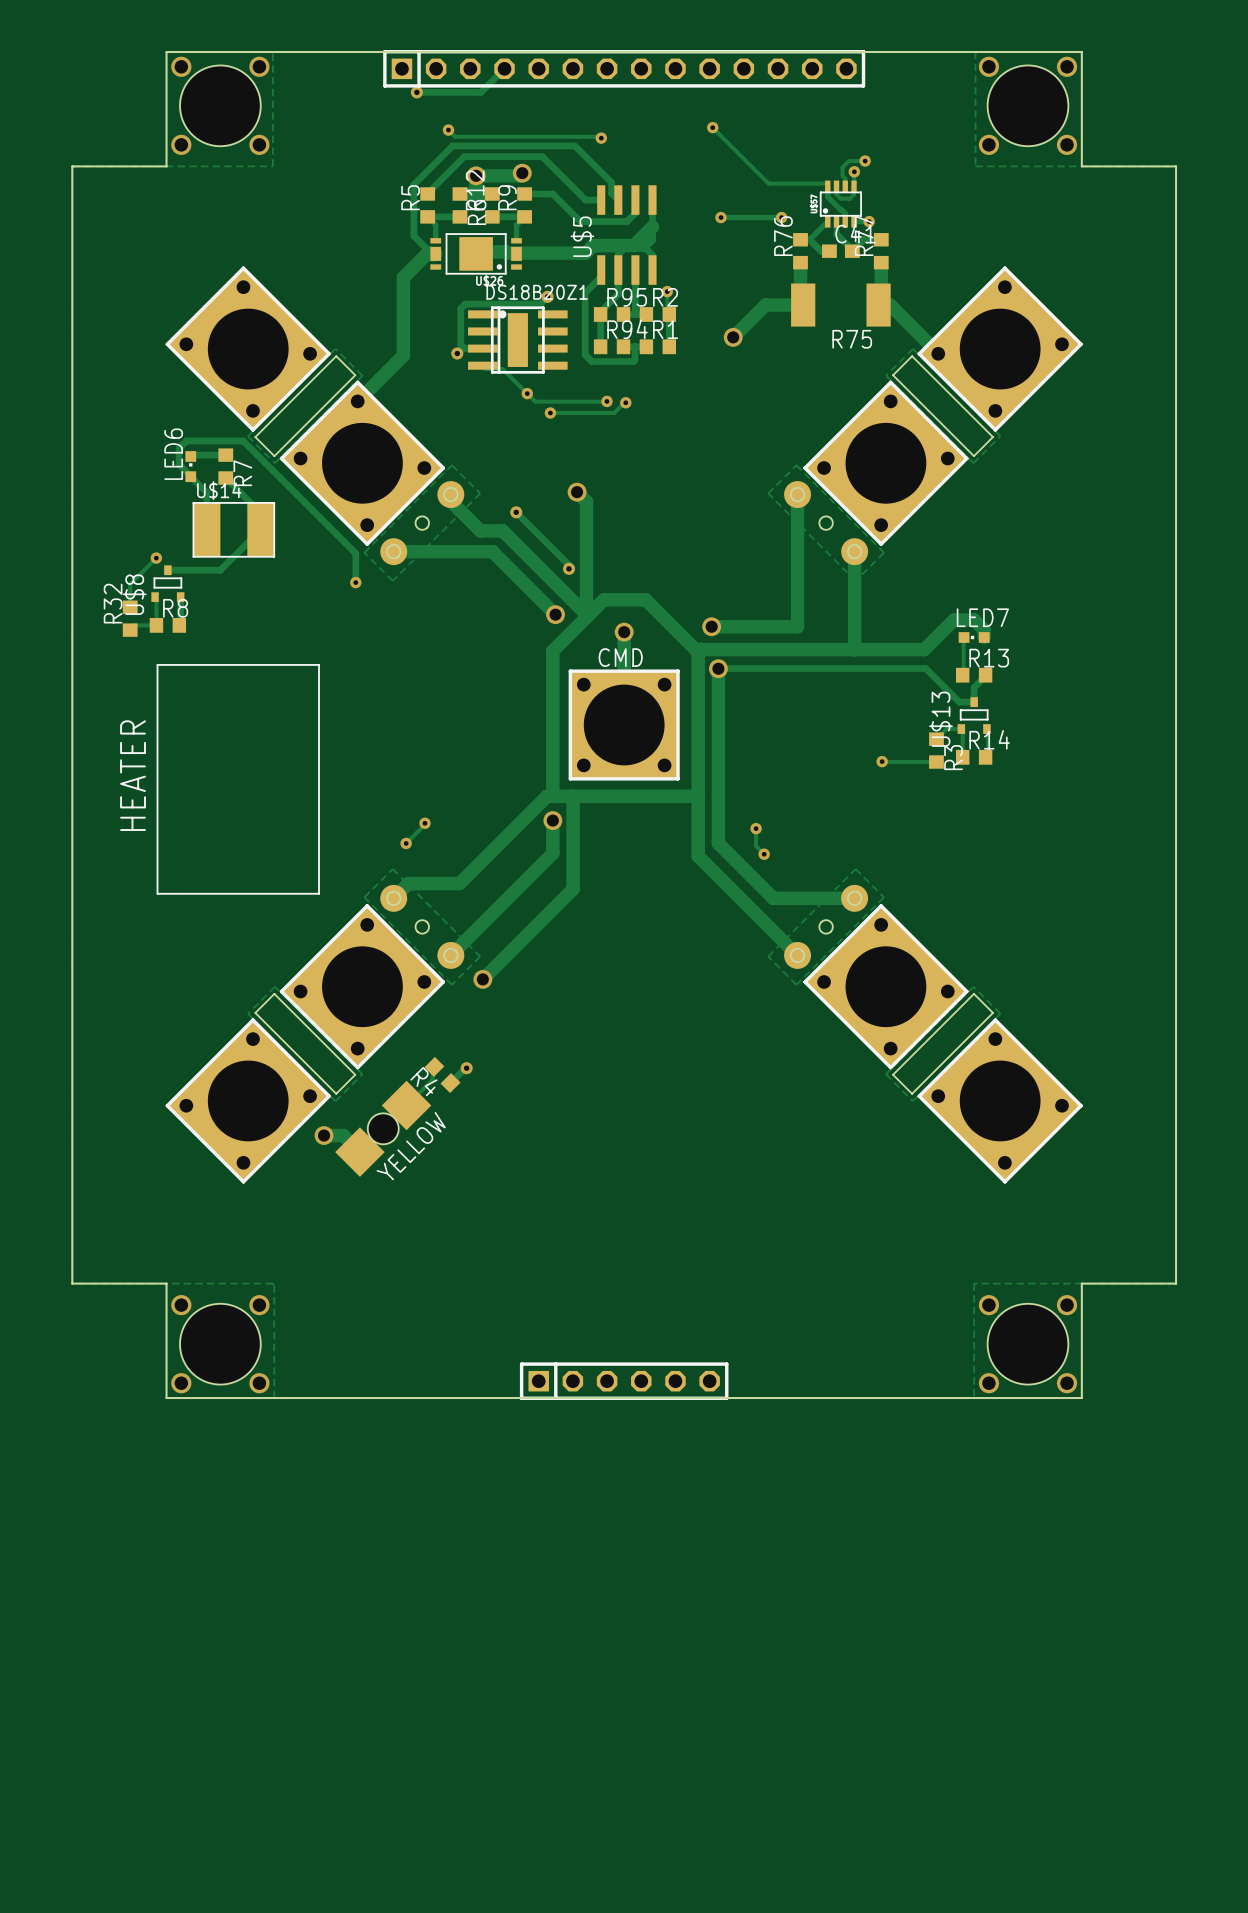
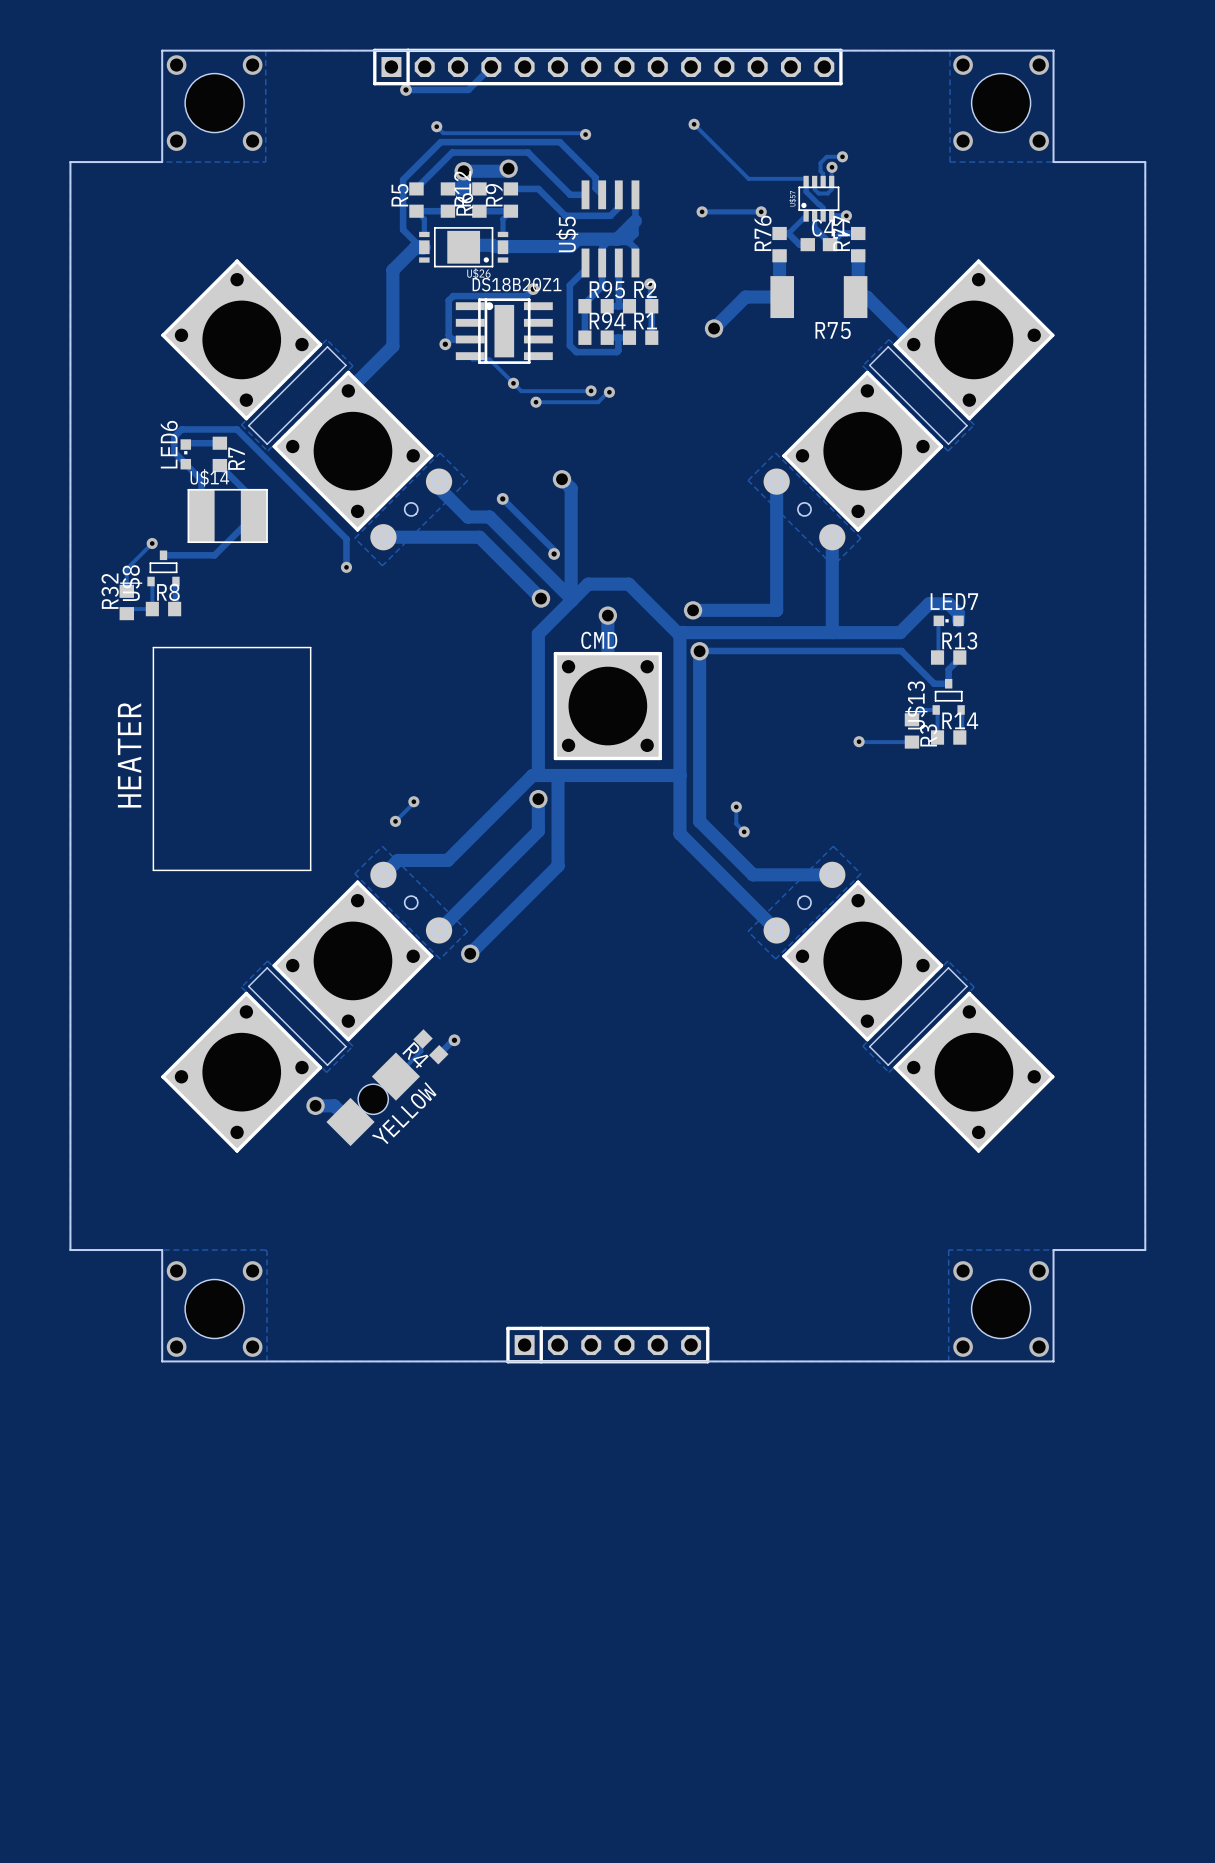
hole size: [180, 65, 261, 147] -> [185, 73, 245, 133]
hole size: [987, 65, 1069, 147] -> [971, 73, 1031, 133]
hole size: [180, 1303, 261, 1385] -> [185, 1279, 245, 1339]
hole size: [987, 1303, 1069, 1385] -> [971, 1279, 1031, 1339]

